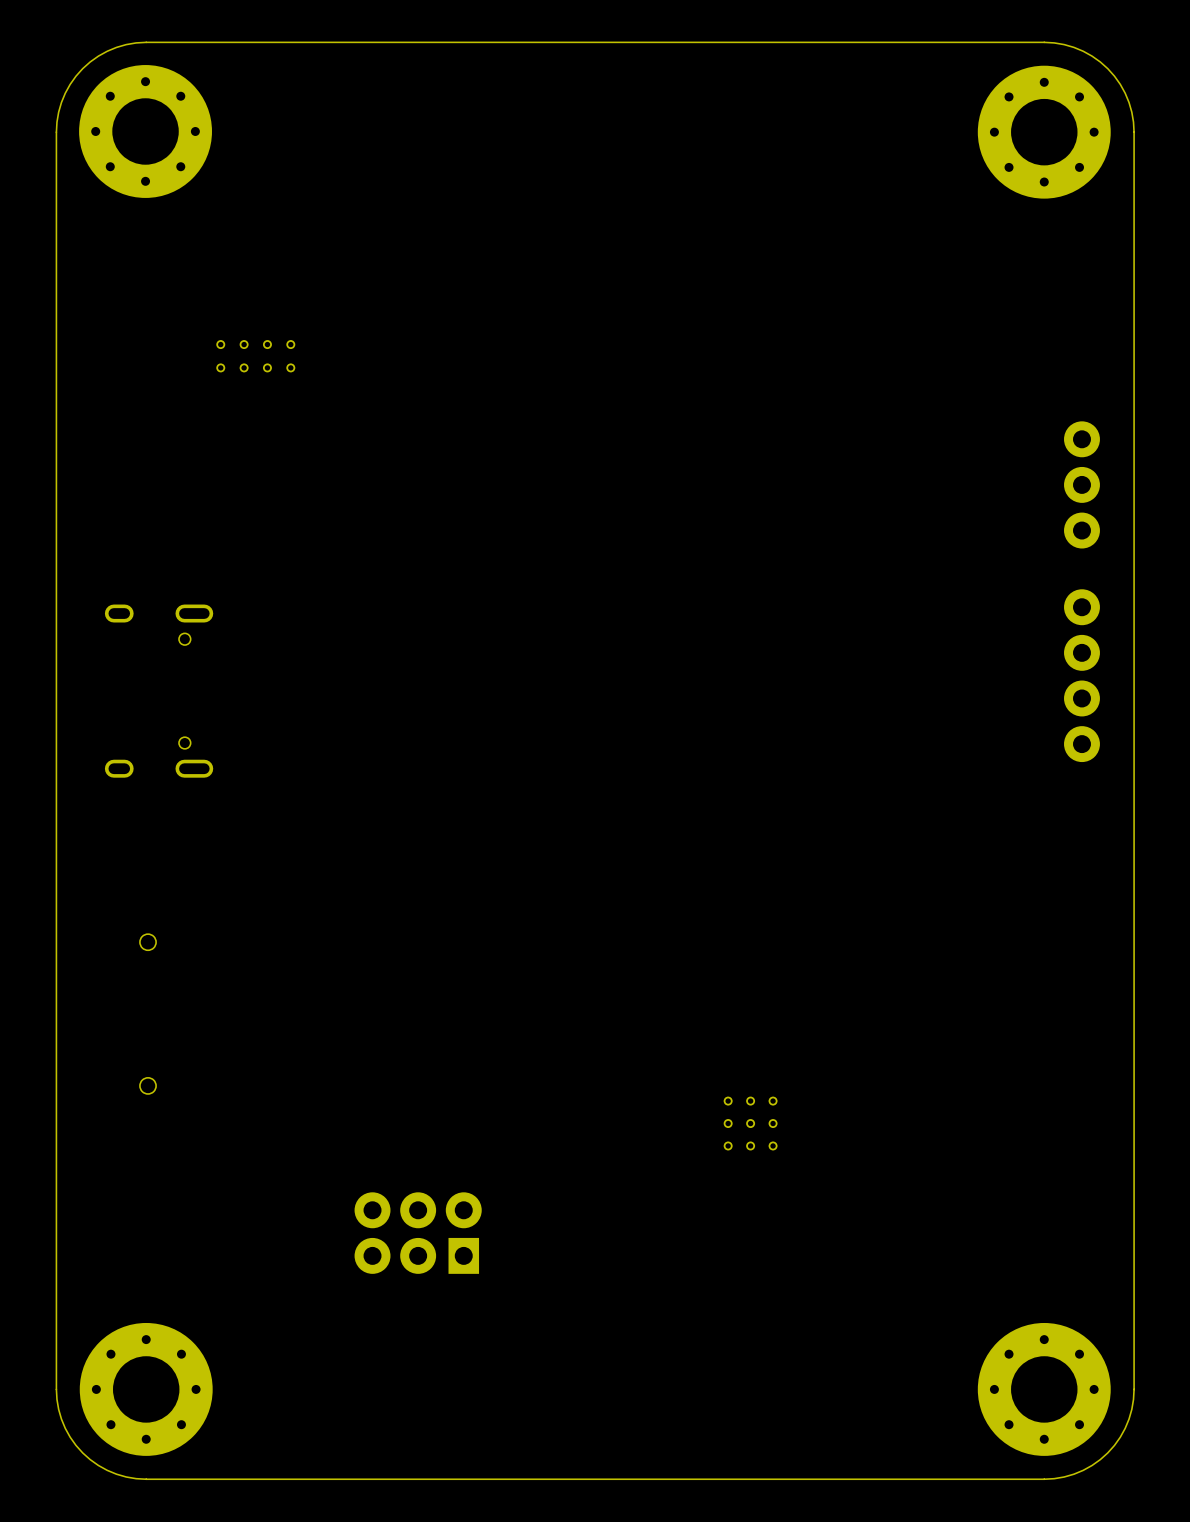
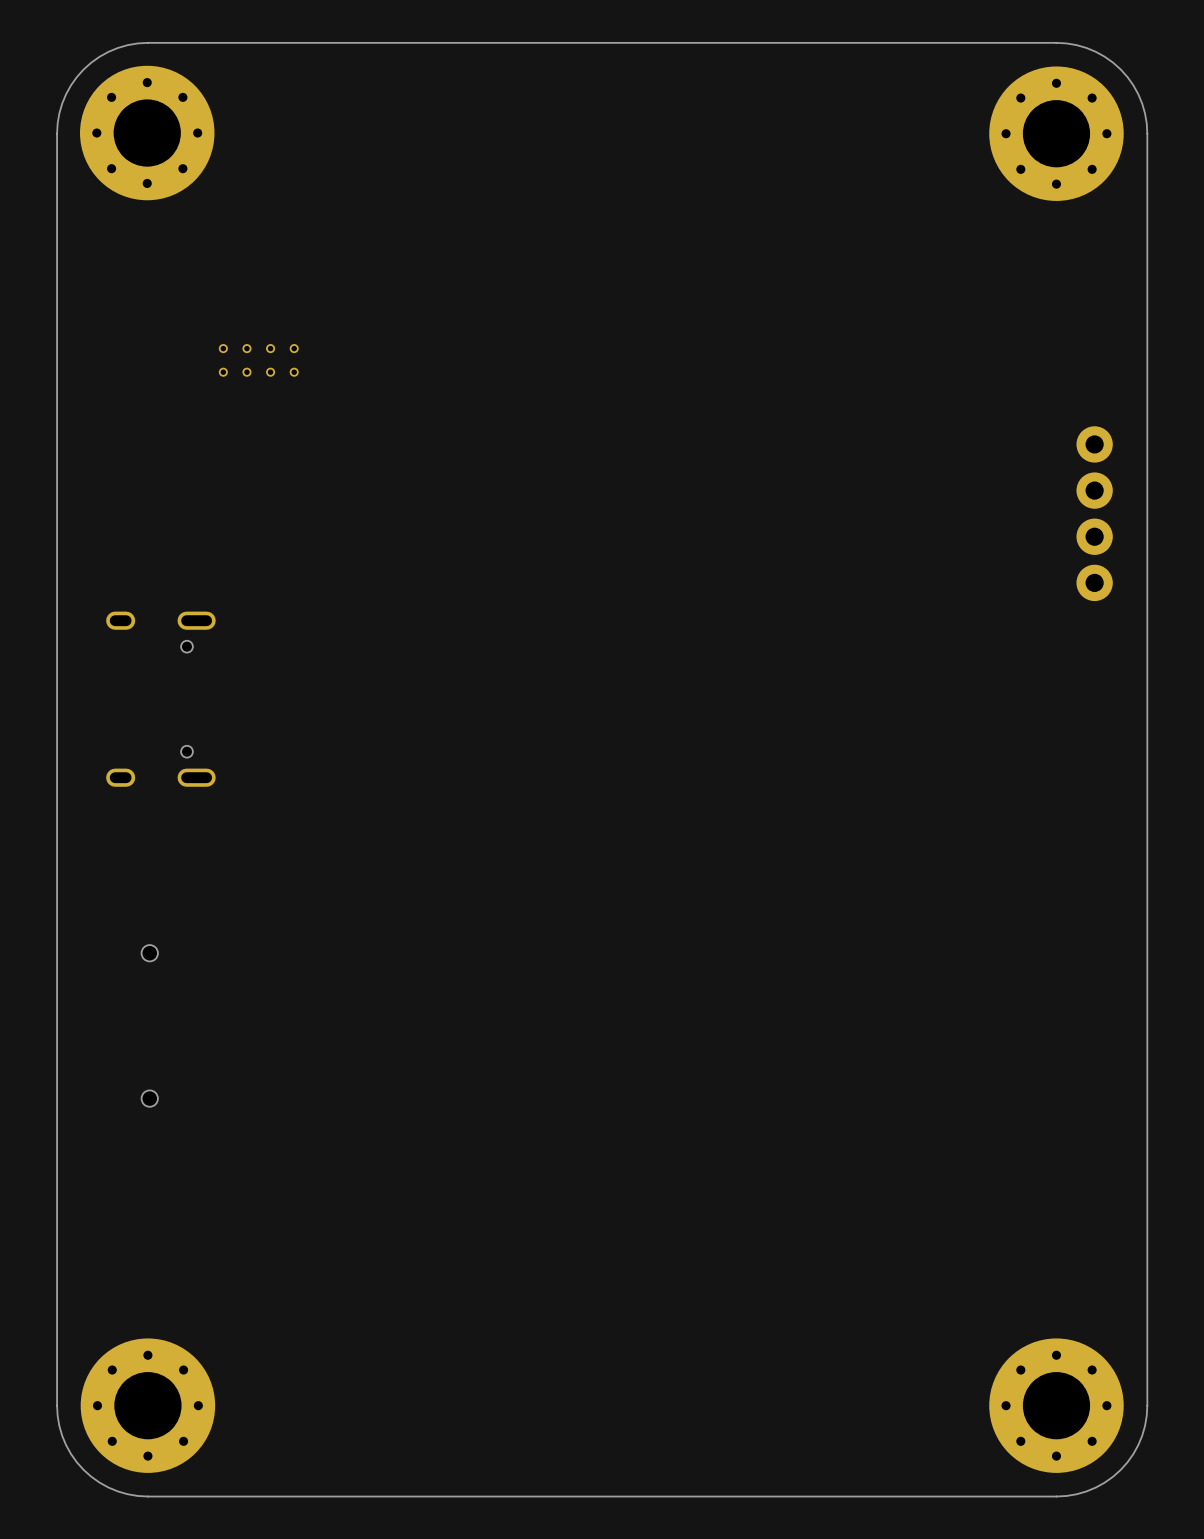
part position: (1081, 675) -> (1094, 513)
part: (750, 1123) -> none
part: (418, 1233) -> none

